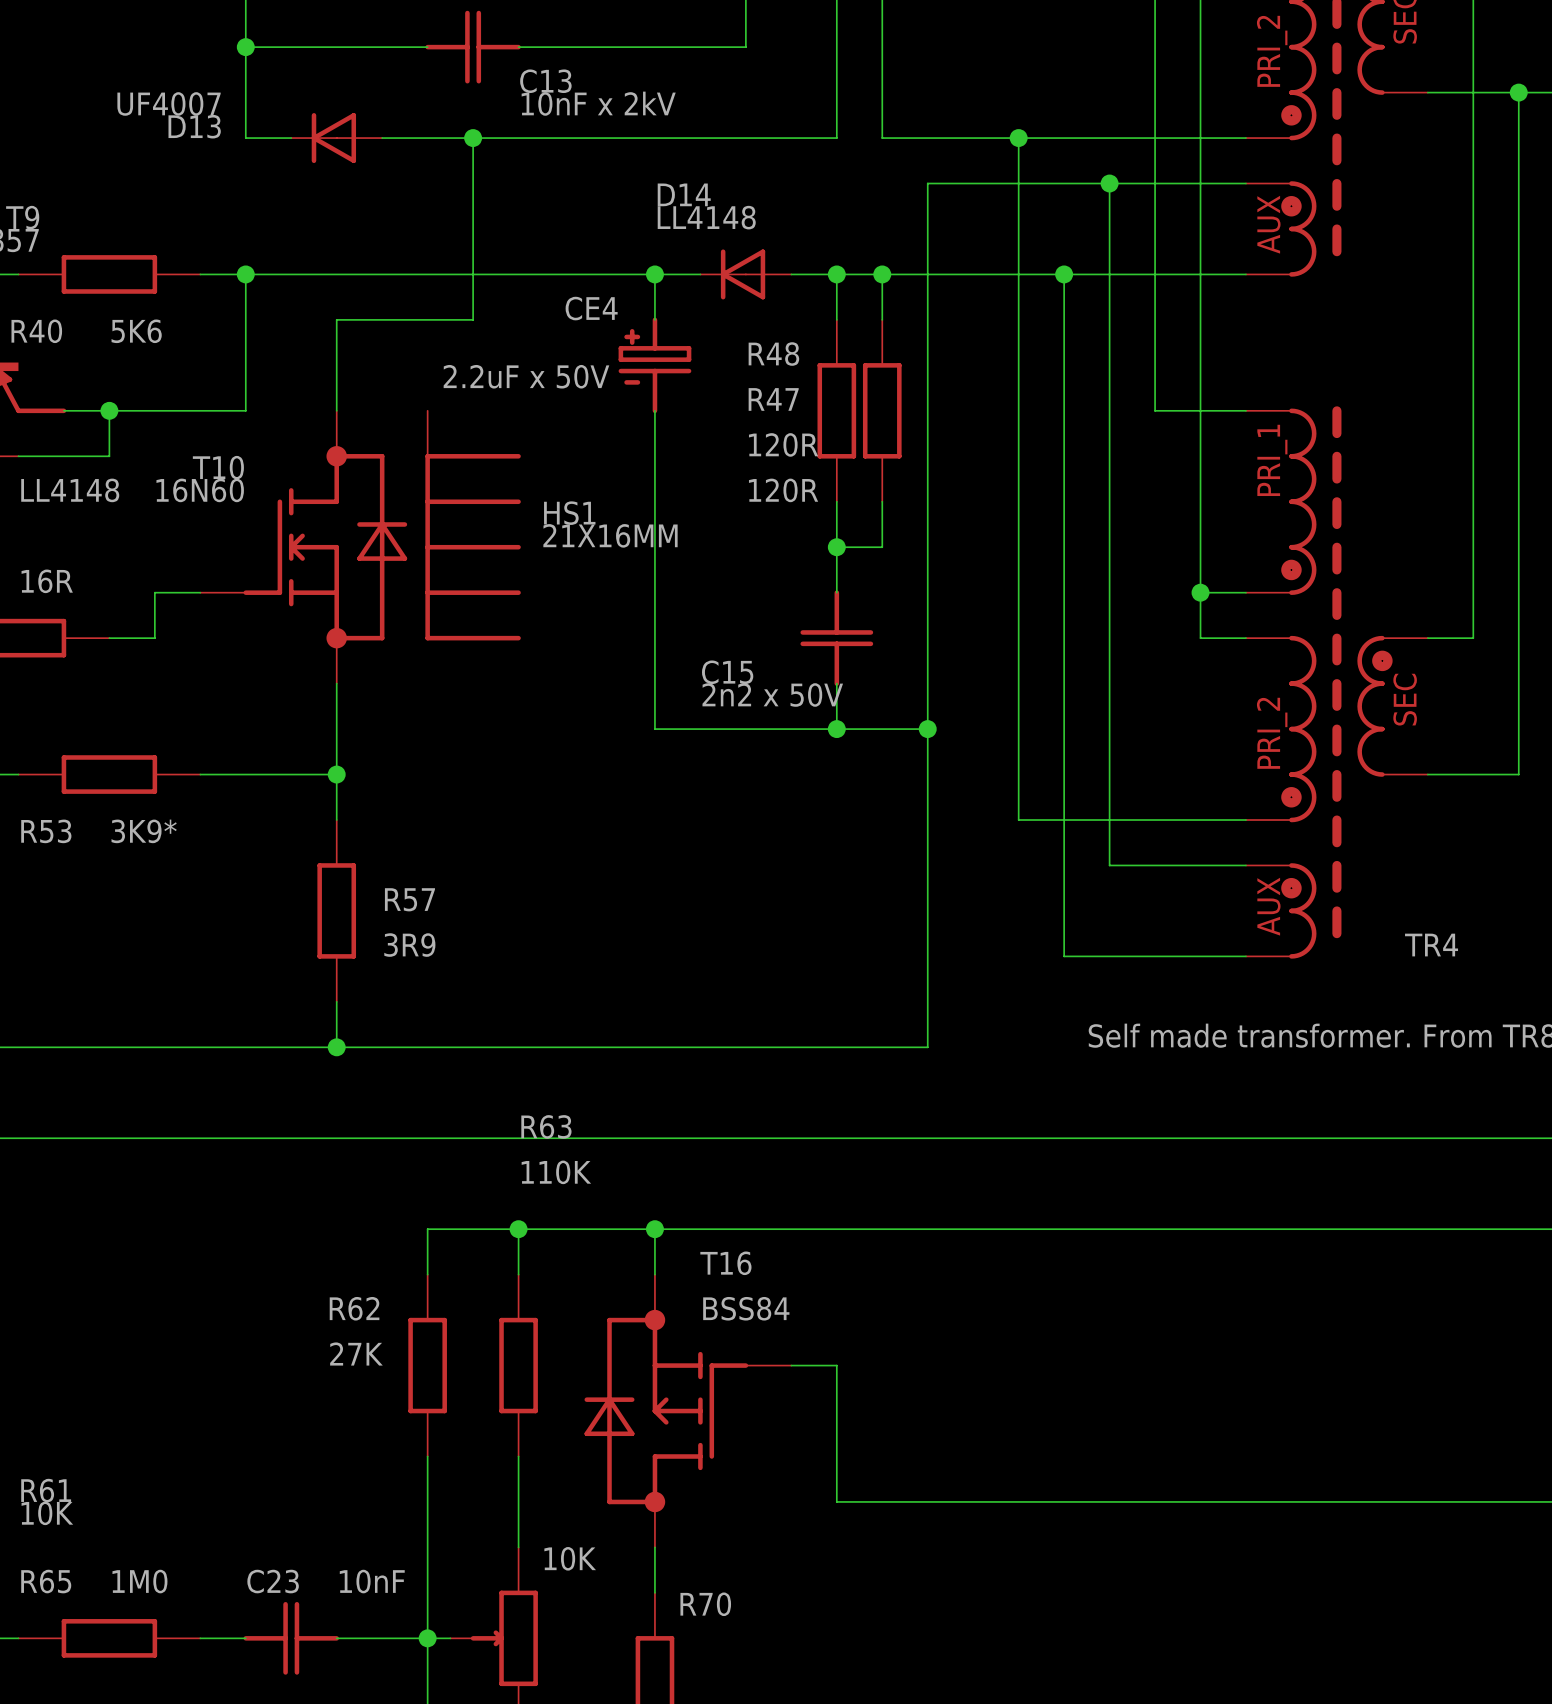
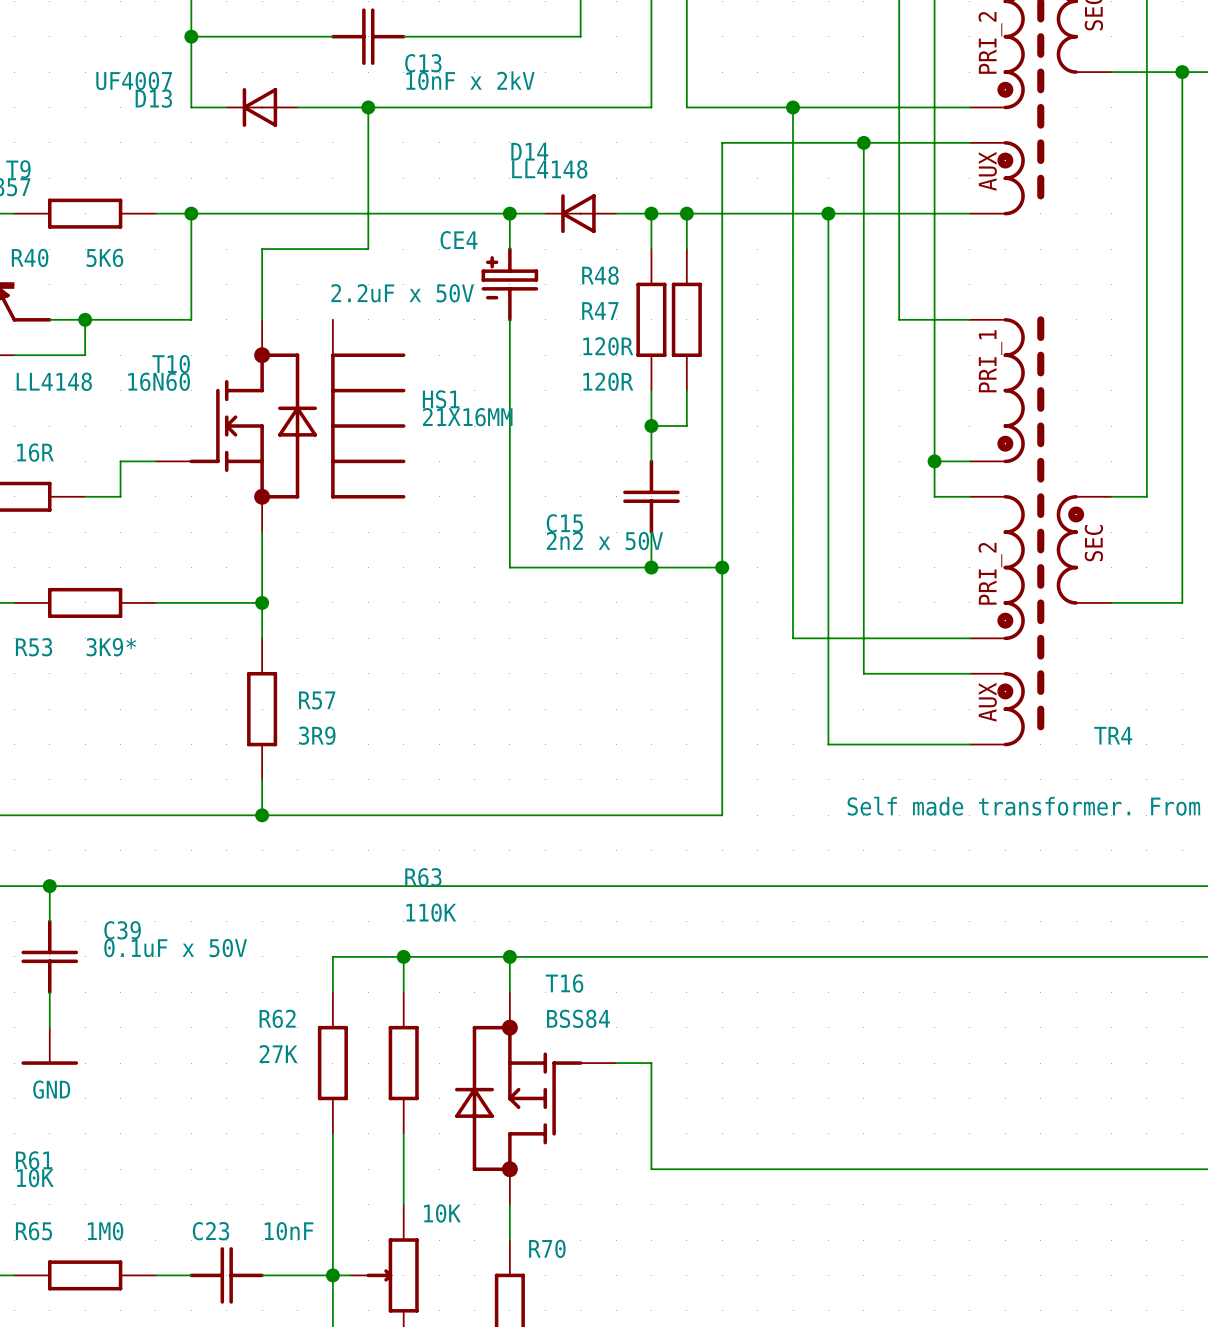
wire: none -> (49, 886) (49, 921)
junction: none -> (49, 886)
C39: none -> 0.1uF x 50V (49, 956)
wire: none -> (49, 992) (49, 1027)
power symbol: none -> GND (49, 1046)

